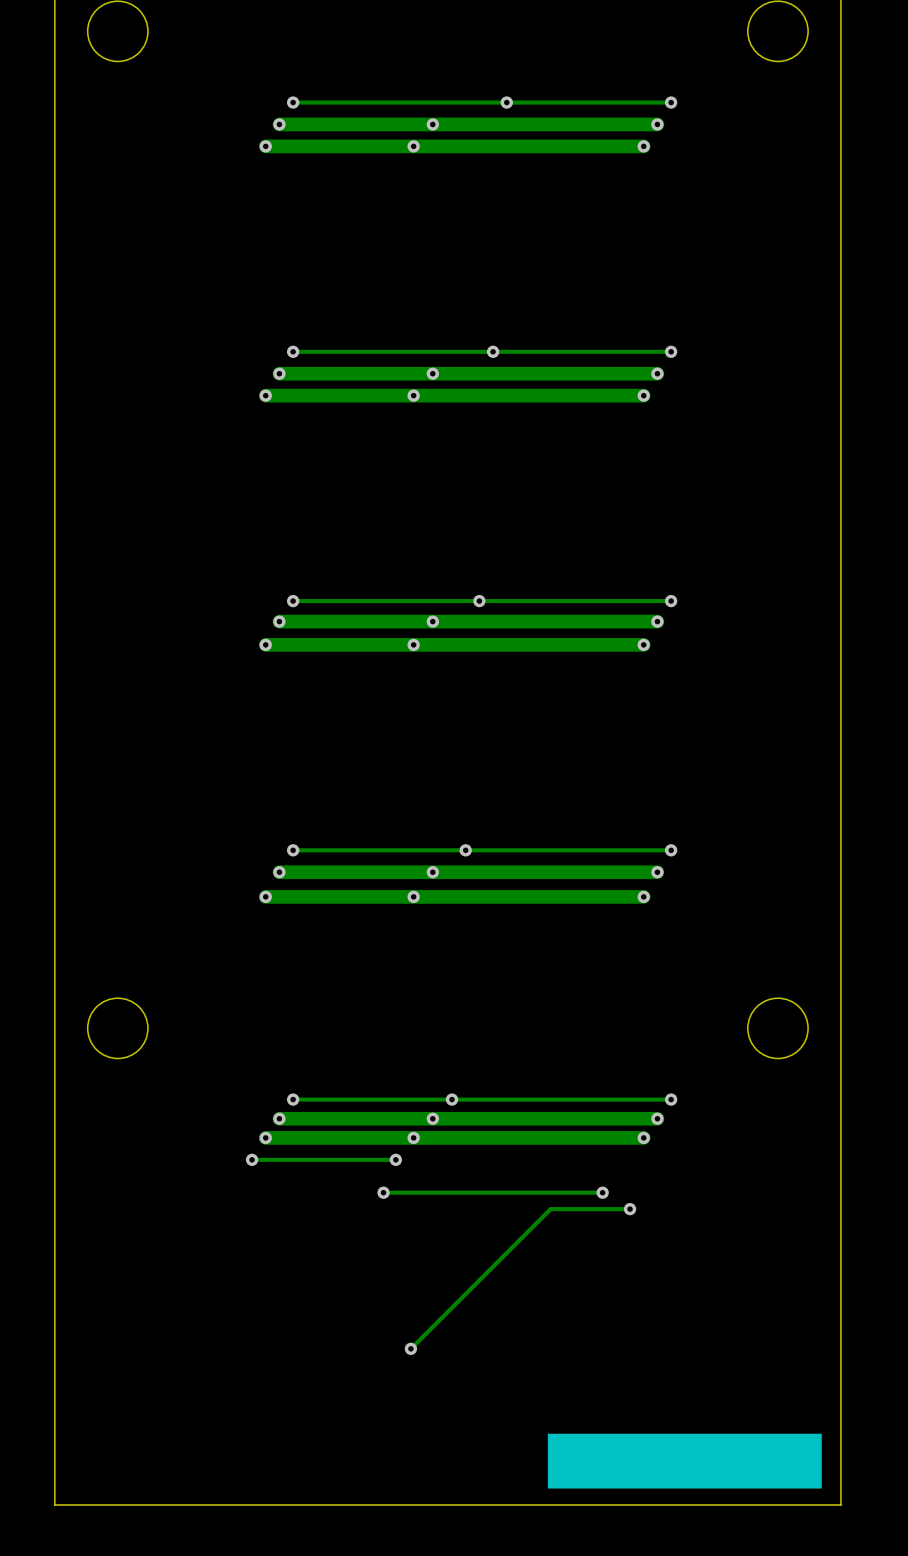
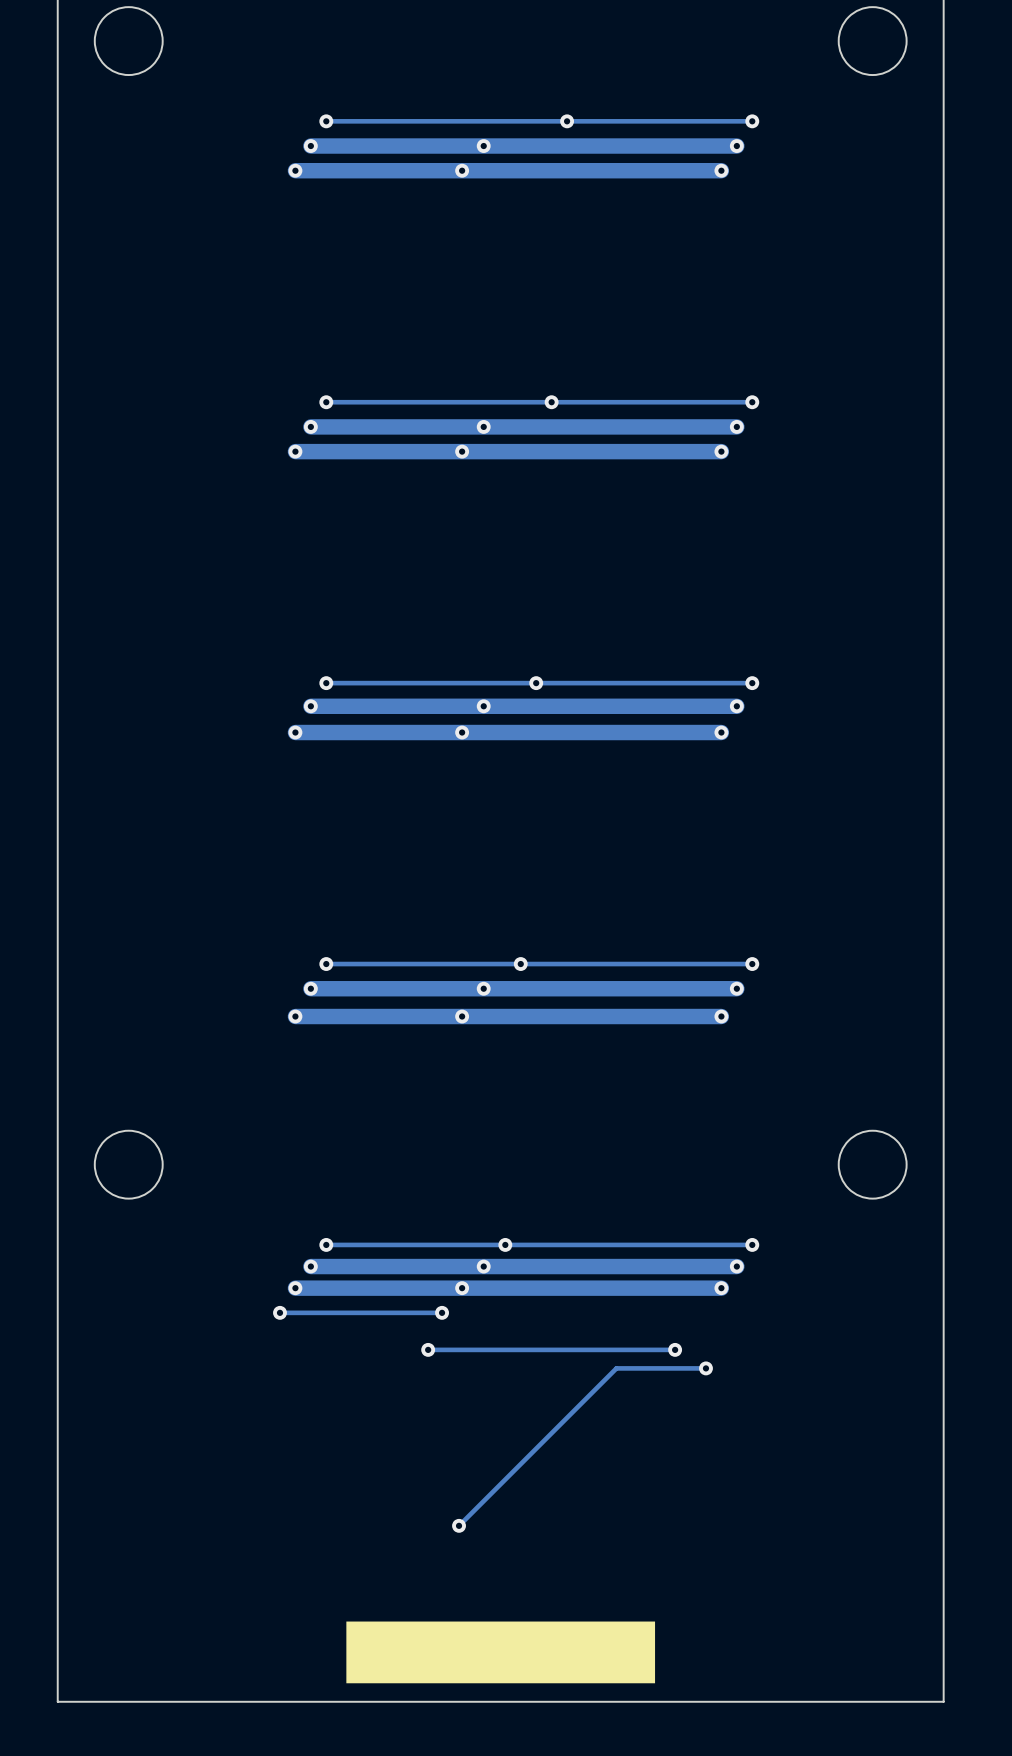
drawing position: (684, 1461) -> (500, 1652)

